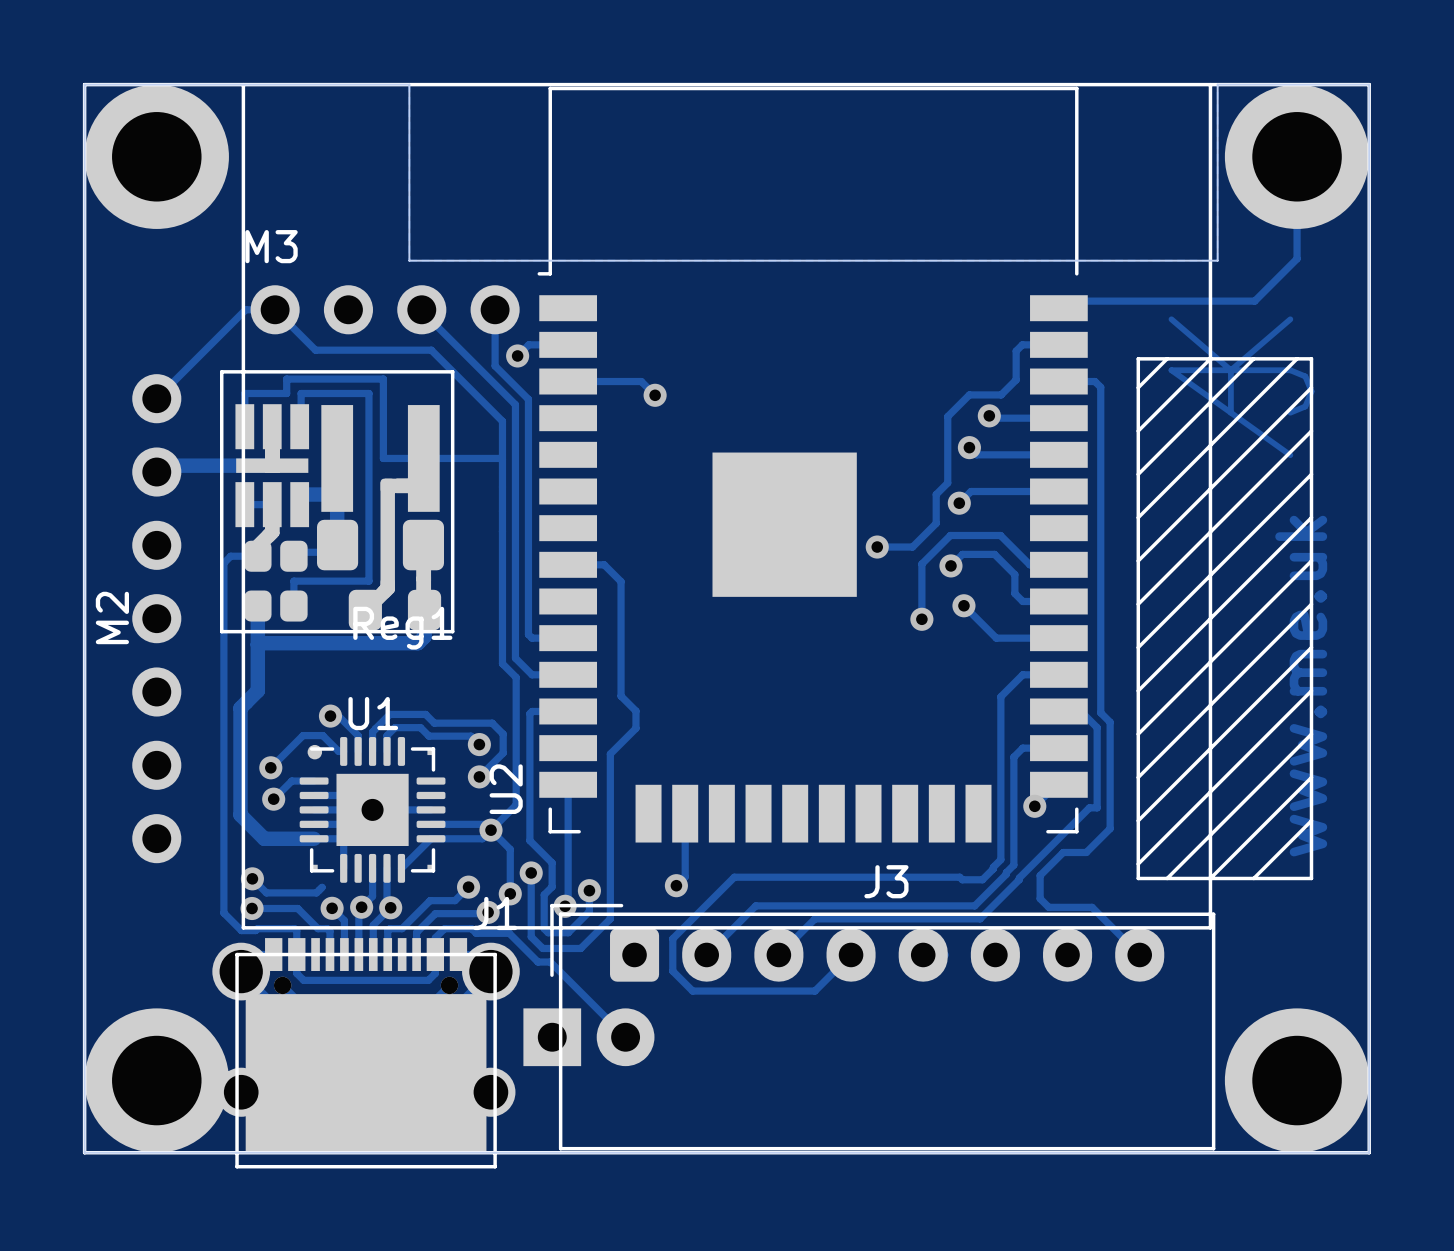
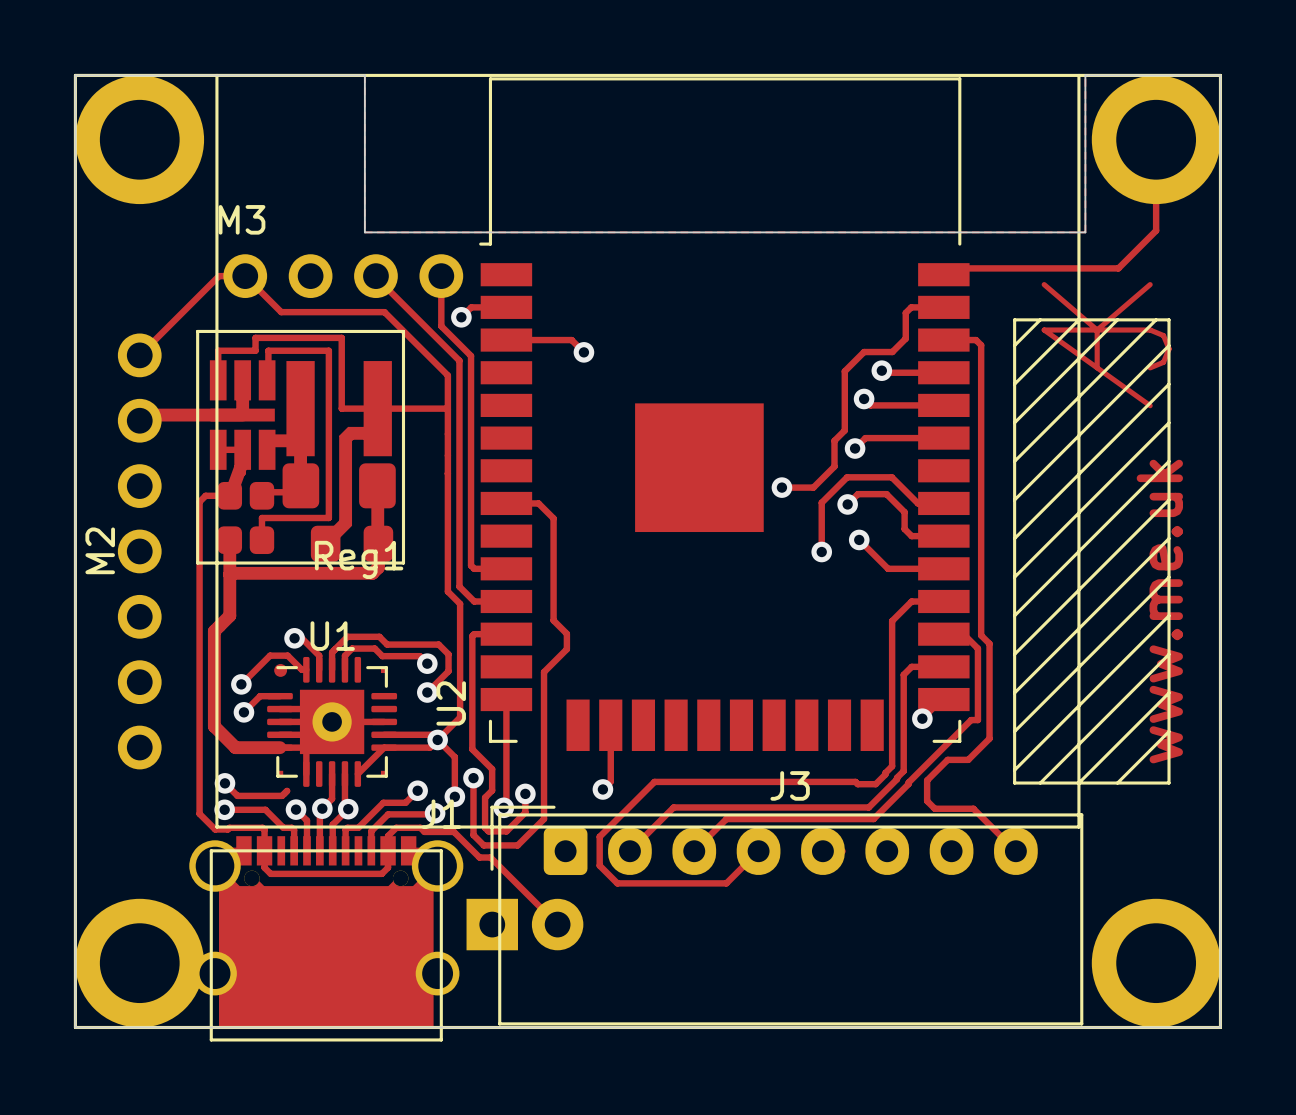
Reg1 footprint: [220, 370, 455, 634] -> [196, 329, 406, 565]

